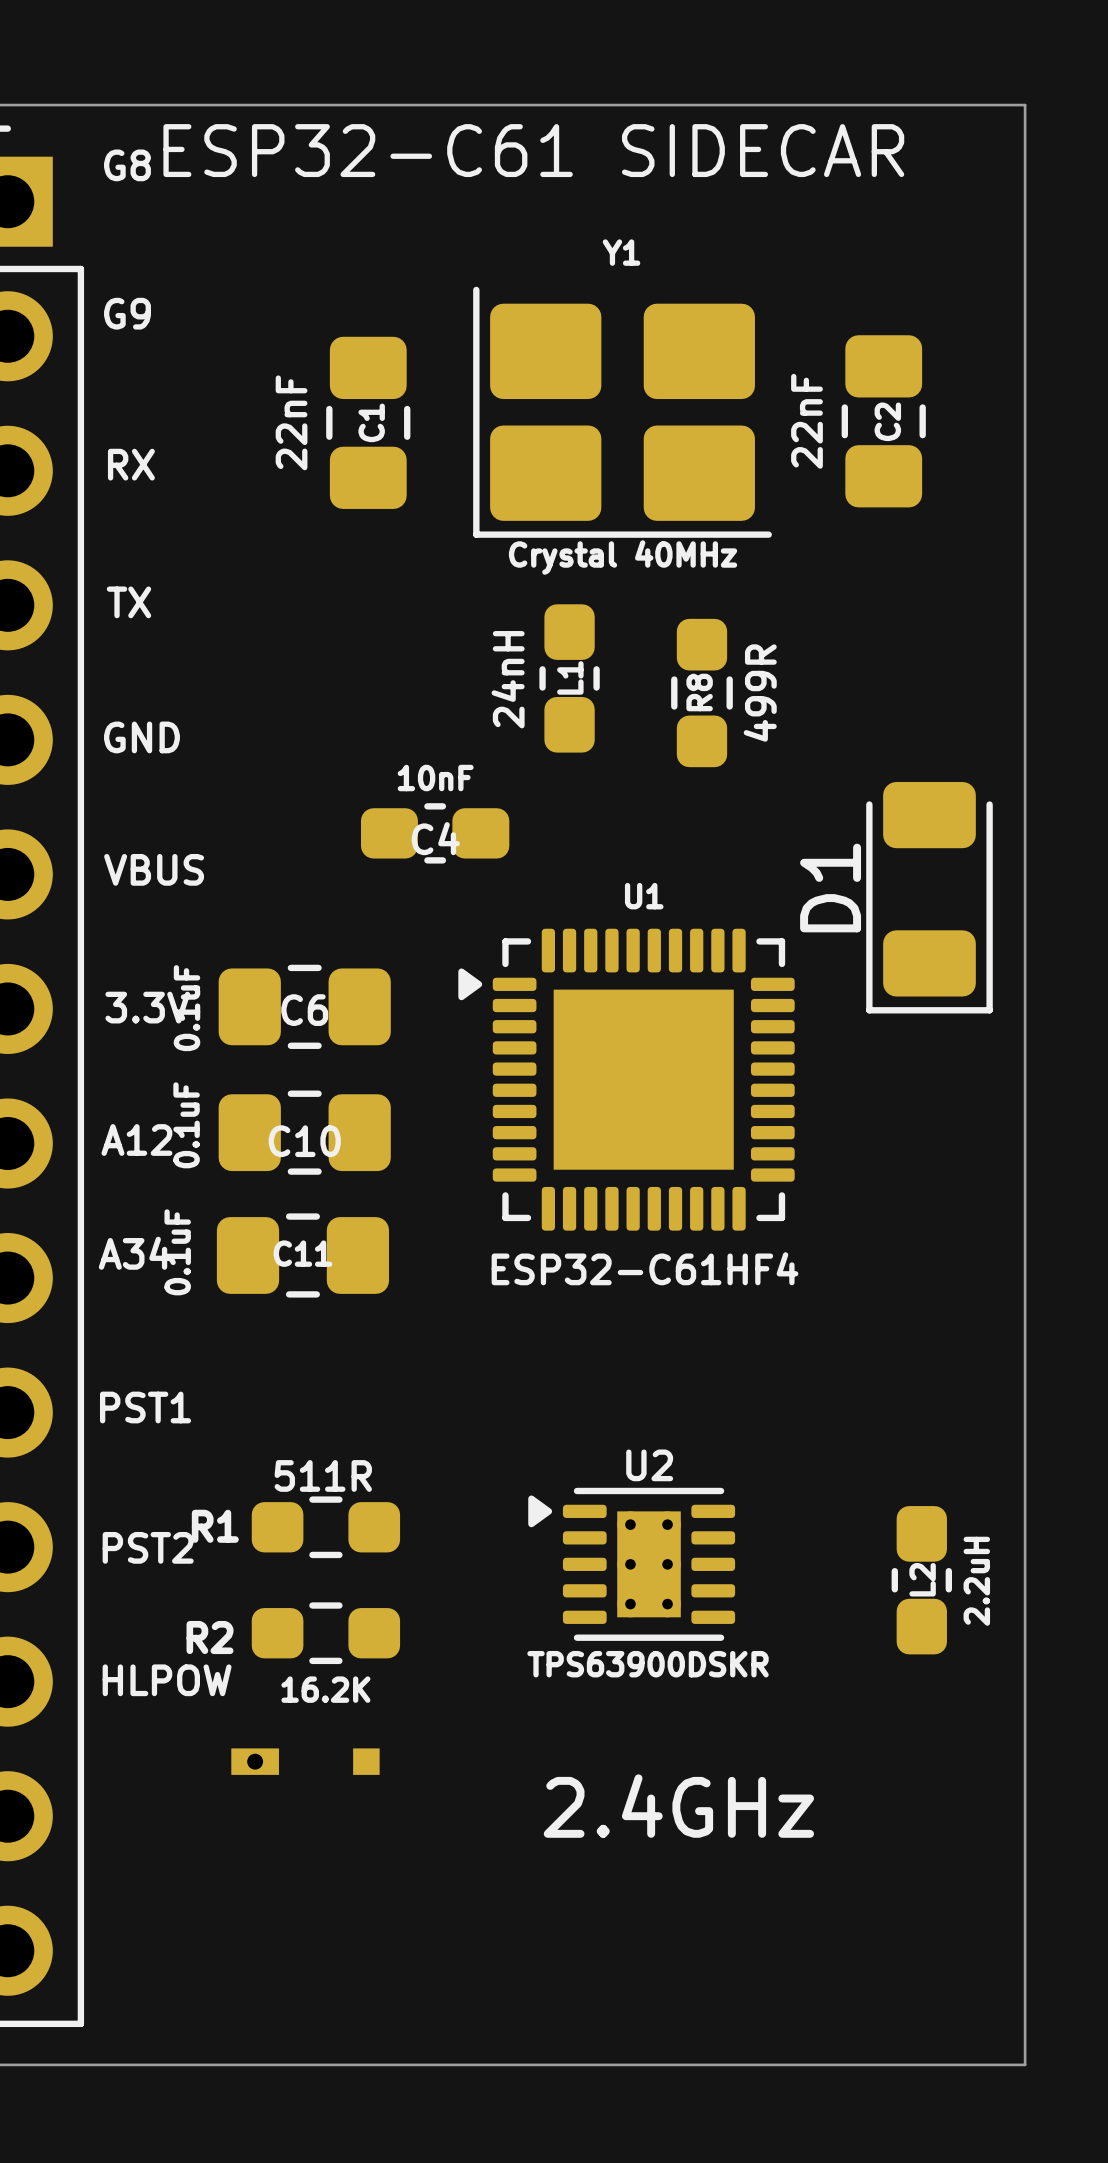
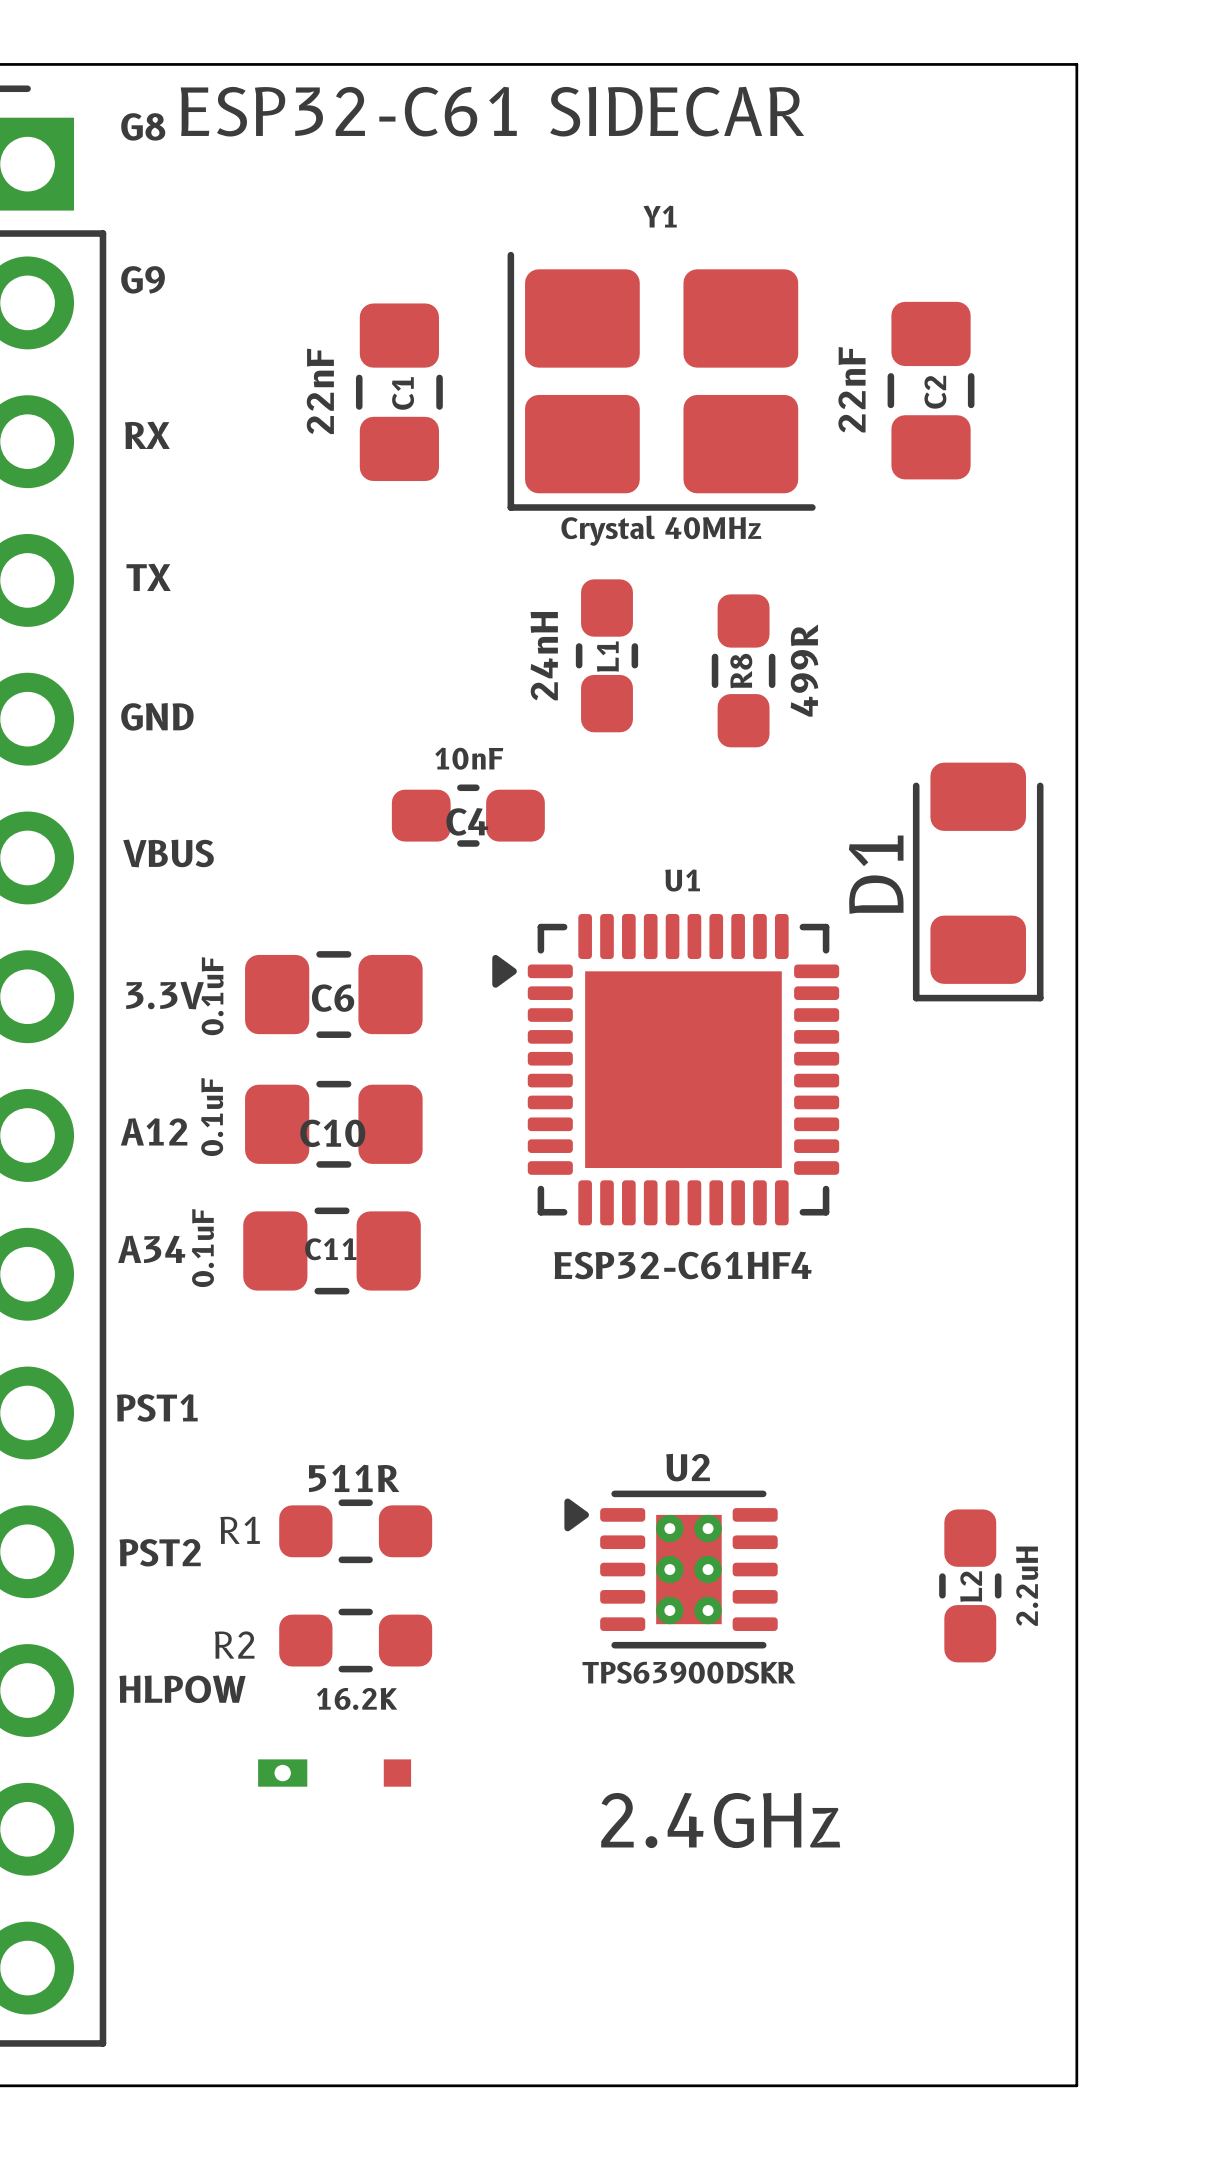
U1 footprint: [458, 928, 795, 1231] -> [492, 913, 840, 1226]

